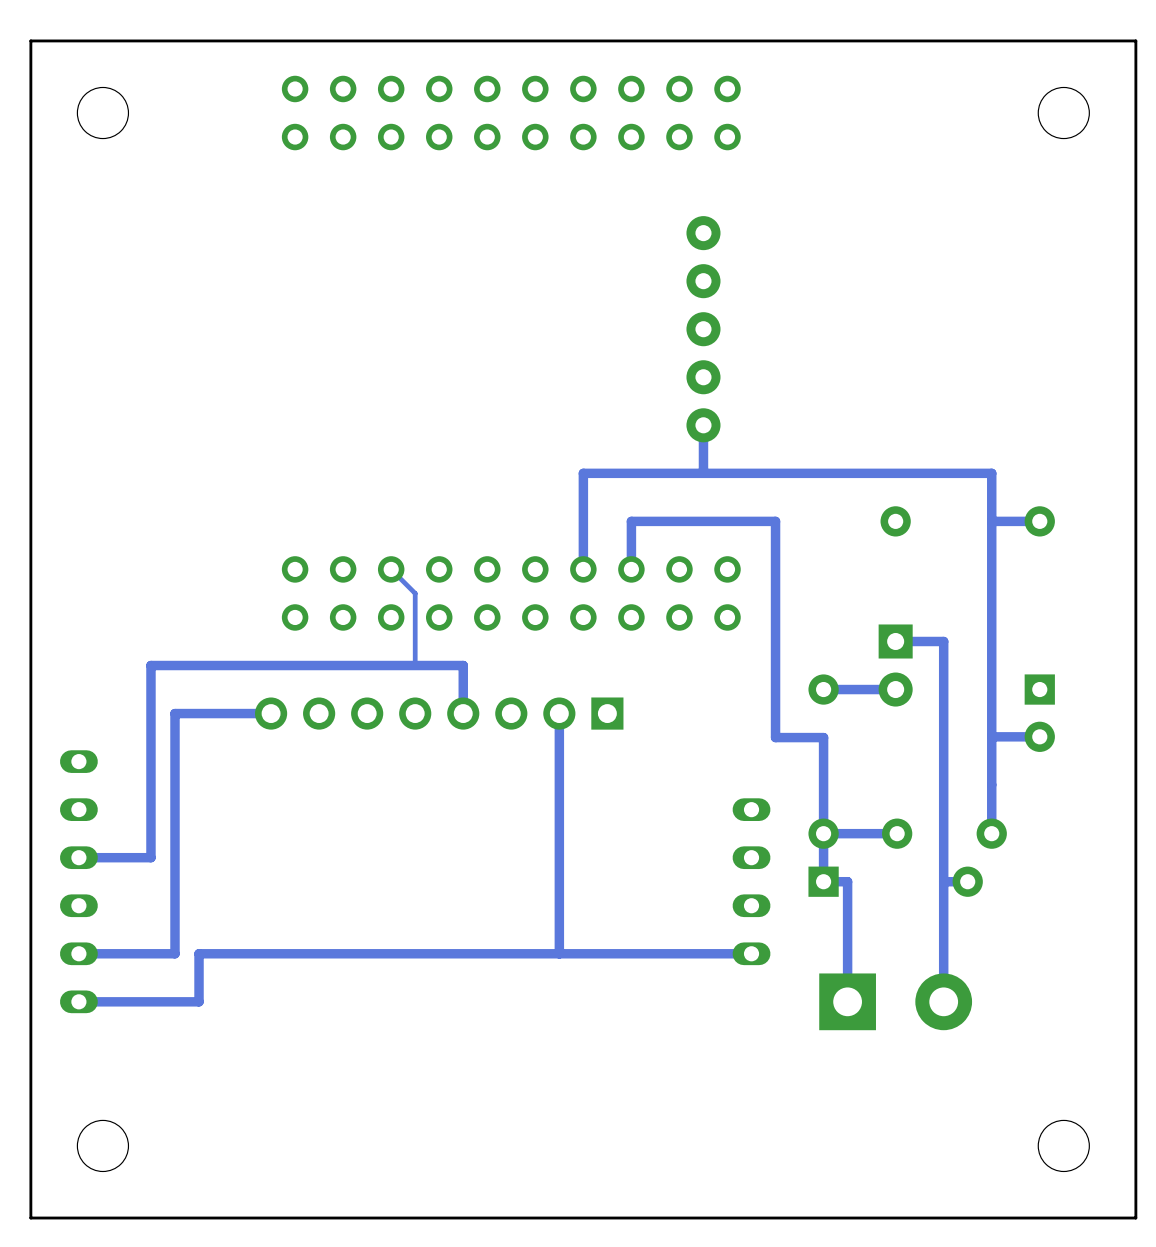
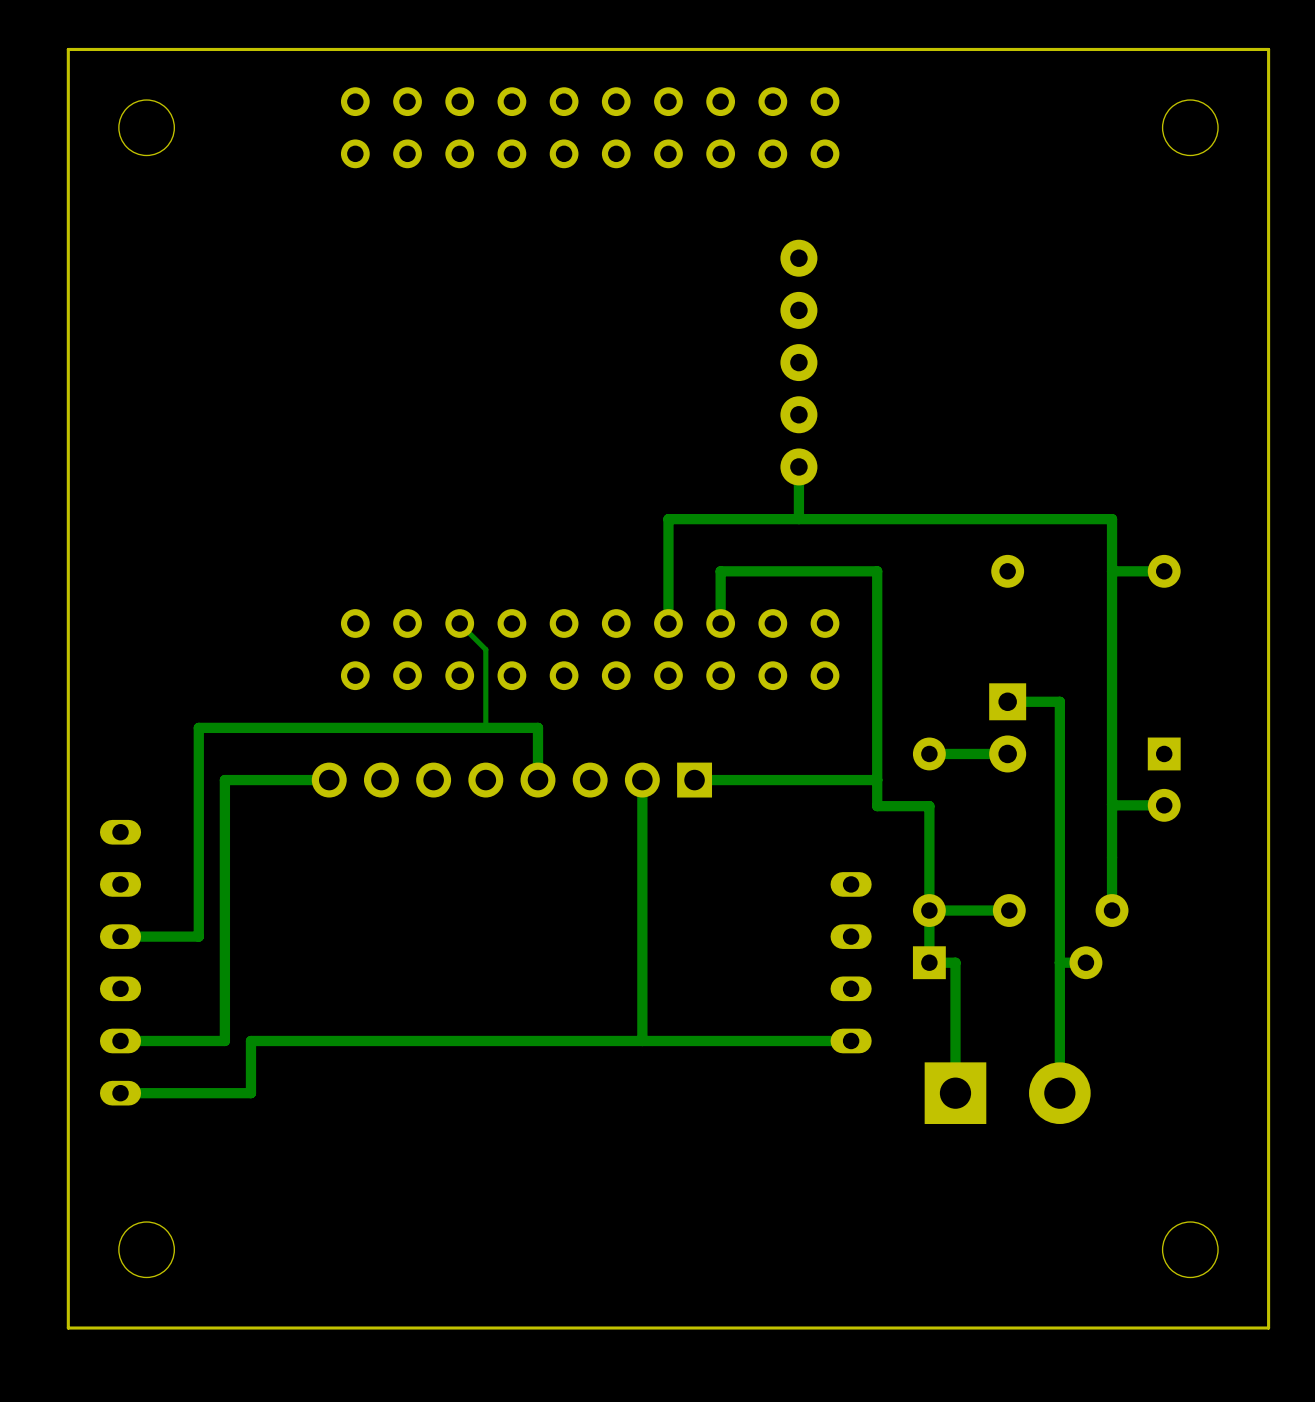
track: none -> (877, 780) (694, 780)

